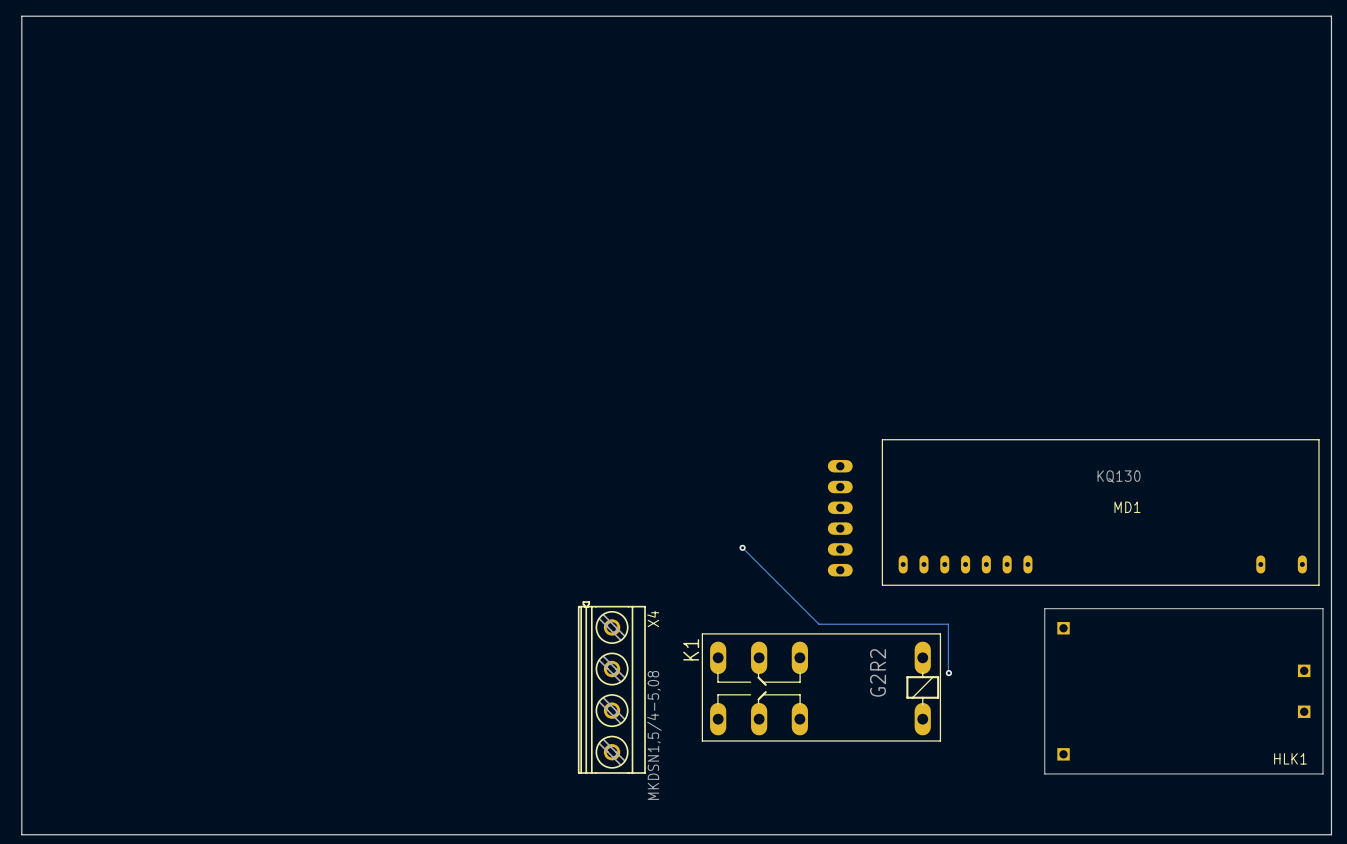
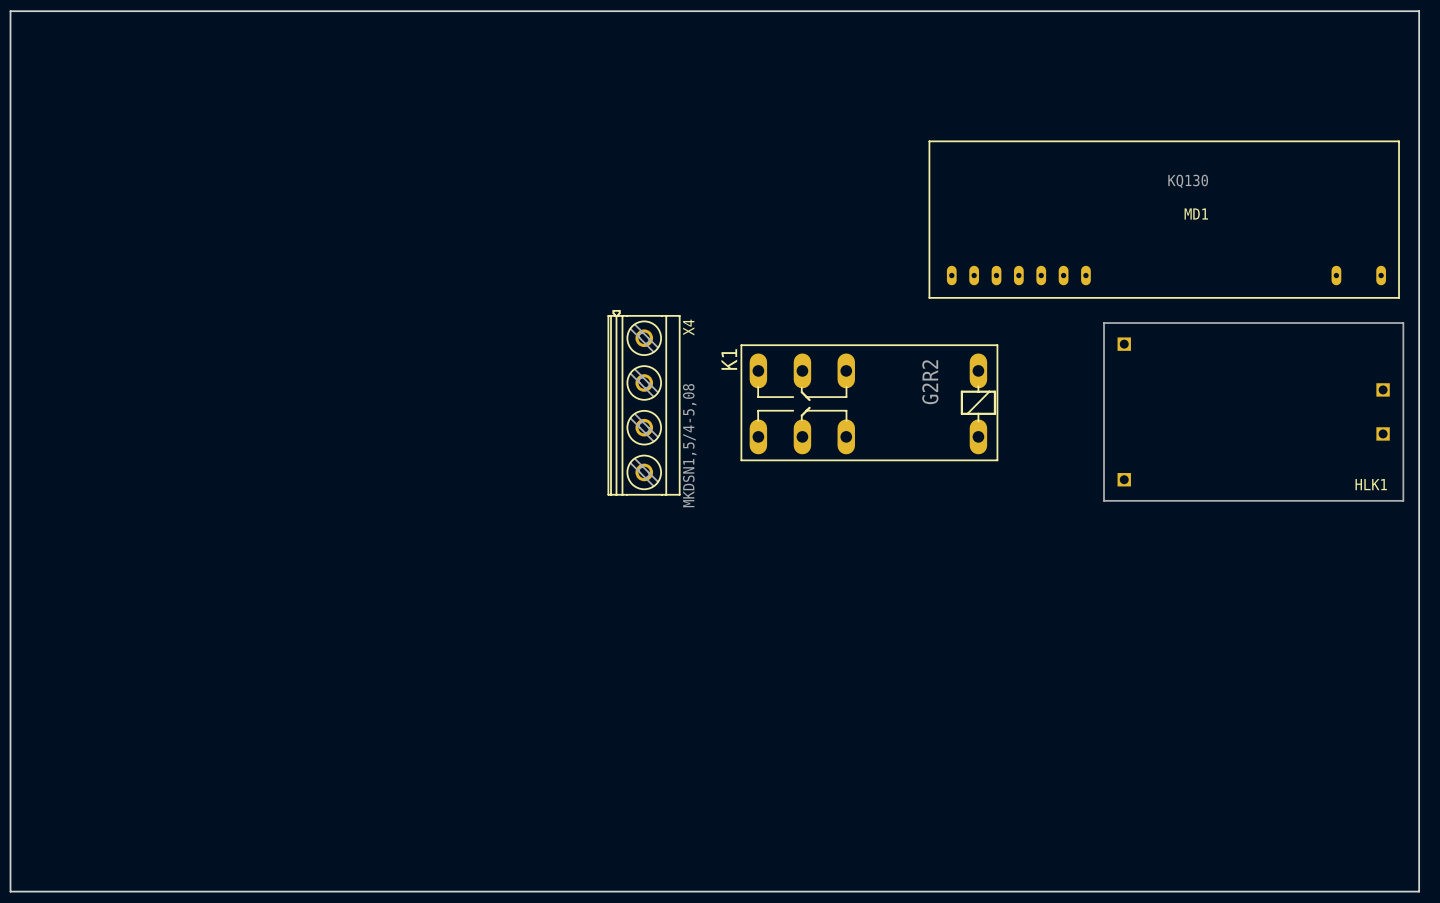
MD1 position: (1100, 512) -> (1164, 219)
part: (840, 518) -> none
track: (742, 547) (818, 624) (948, 624) (948, 673) -> none
via: (742, 547) -> none
via: (948, 673) -> none
X4 position: (611, 687) -> (644, 402)
K1 position: (821, 687) -> (869, 402)
HLK1 position: (1183, 691) -> (1253, 411)

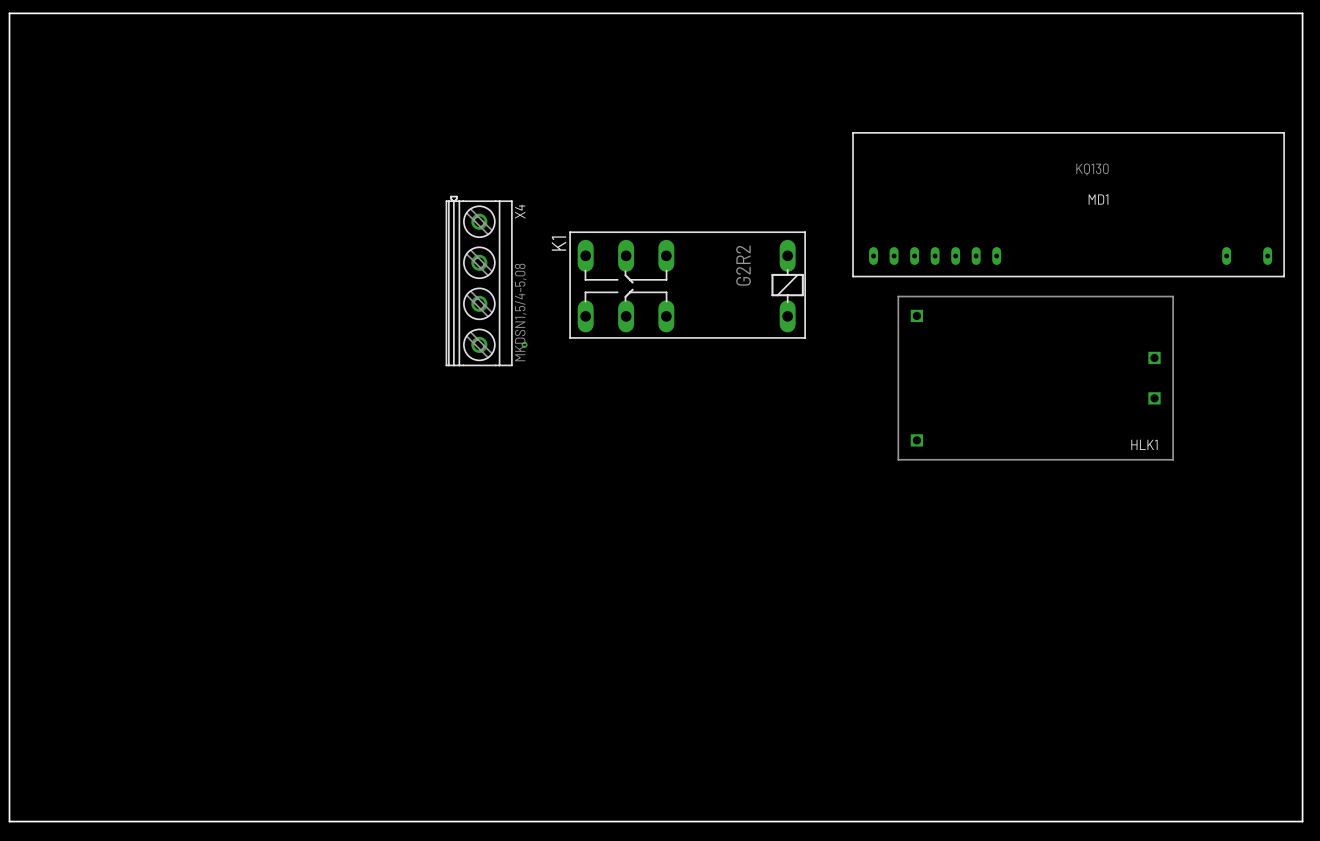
via: none -> (524, 344)
X4 position: (644, 402) -> (479, 281)
K1 position: (869, 402) -> (687, 285)
HLK1 position: (1253, 411) -> (1035, 378)

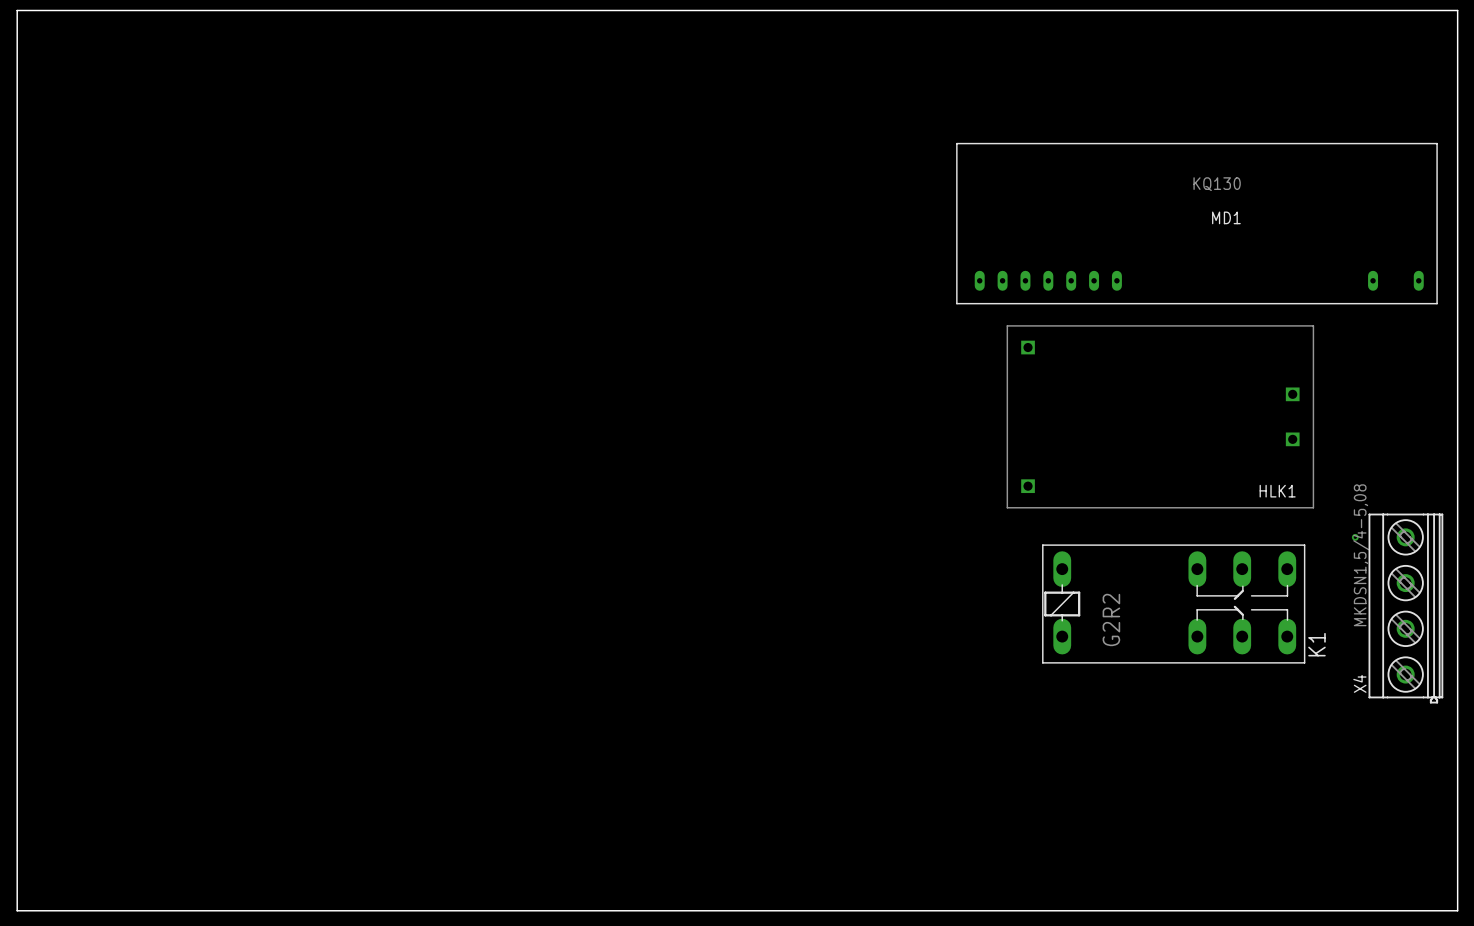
X4 rotation: 0° (479, 281) -> 180° (1405, 608)
X4 position: (479, 281) -> (1405, 608)
K1 rotation: 0° (687, 285) -> 180° (1173, 603)
K1 position: (687, 285) -> (1173, 603)
via: (524, 344) -> none
via: none -> (1355, 537)

